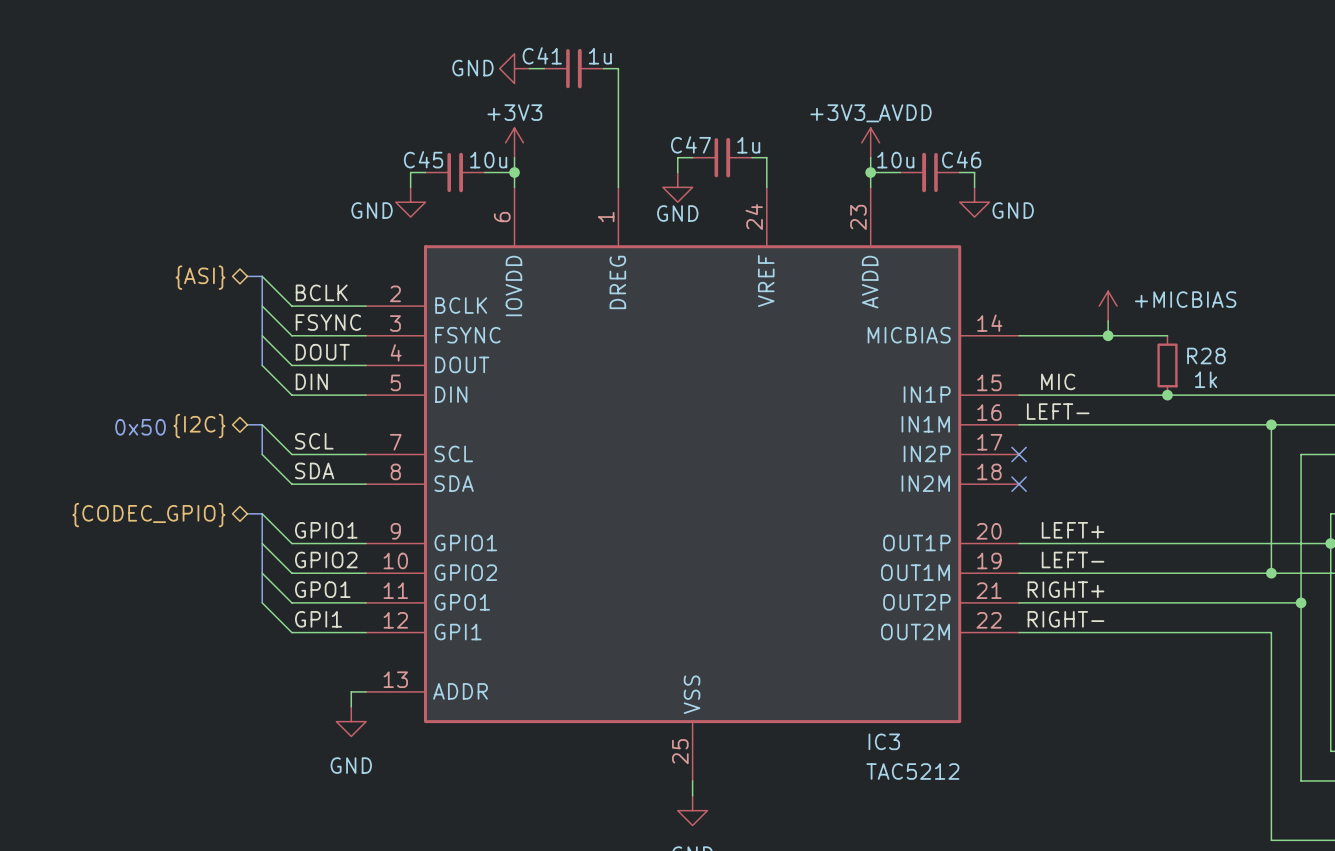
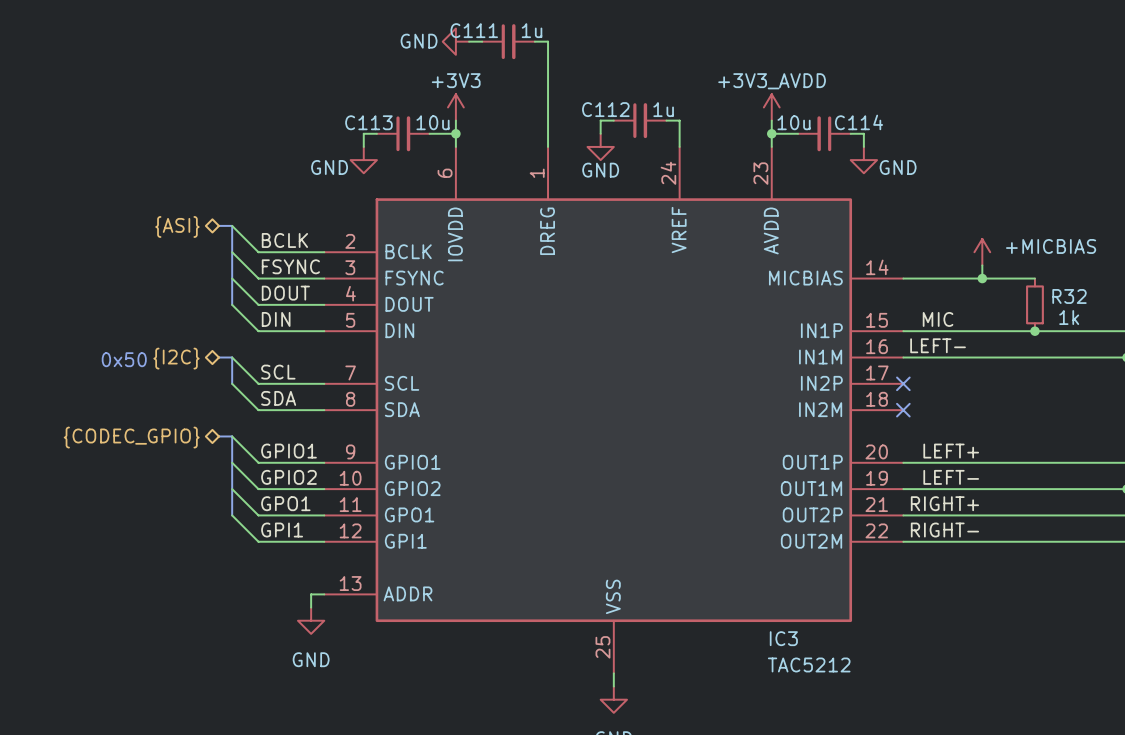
C41 name: C41 (542, 55) -> C111 (474, 30)
C47 name: C47 (691, 144) -> C112 (605, 109)
C45 name: C45 (423, 159) -> C113 (368, 122)
C46 name: C46 (961, 159) -> C114 (859, 122)
R28 name: R28 (1206, 355) -> R32 (1069, 296)

